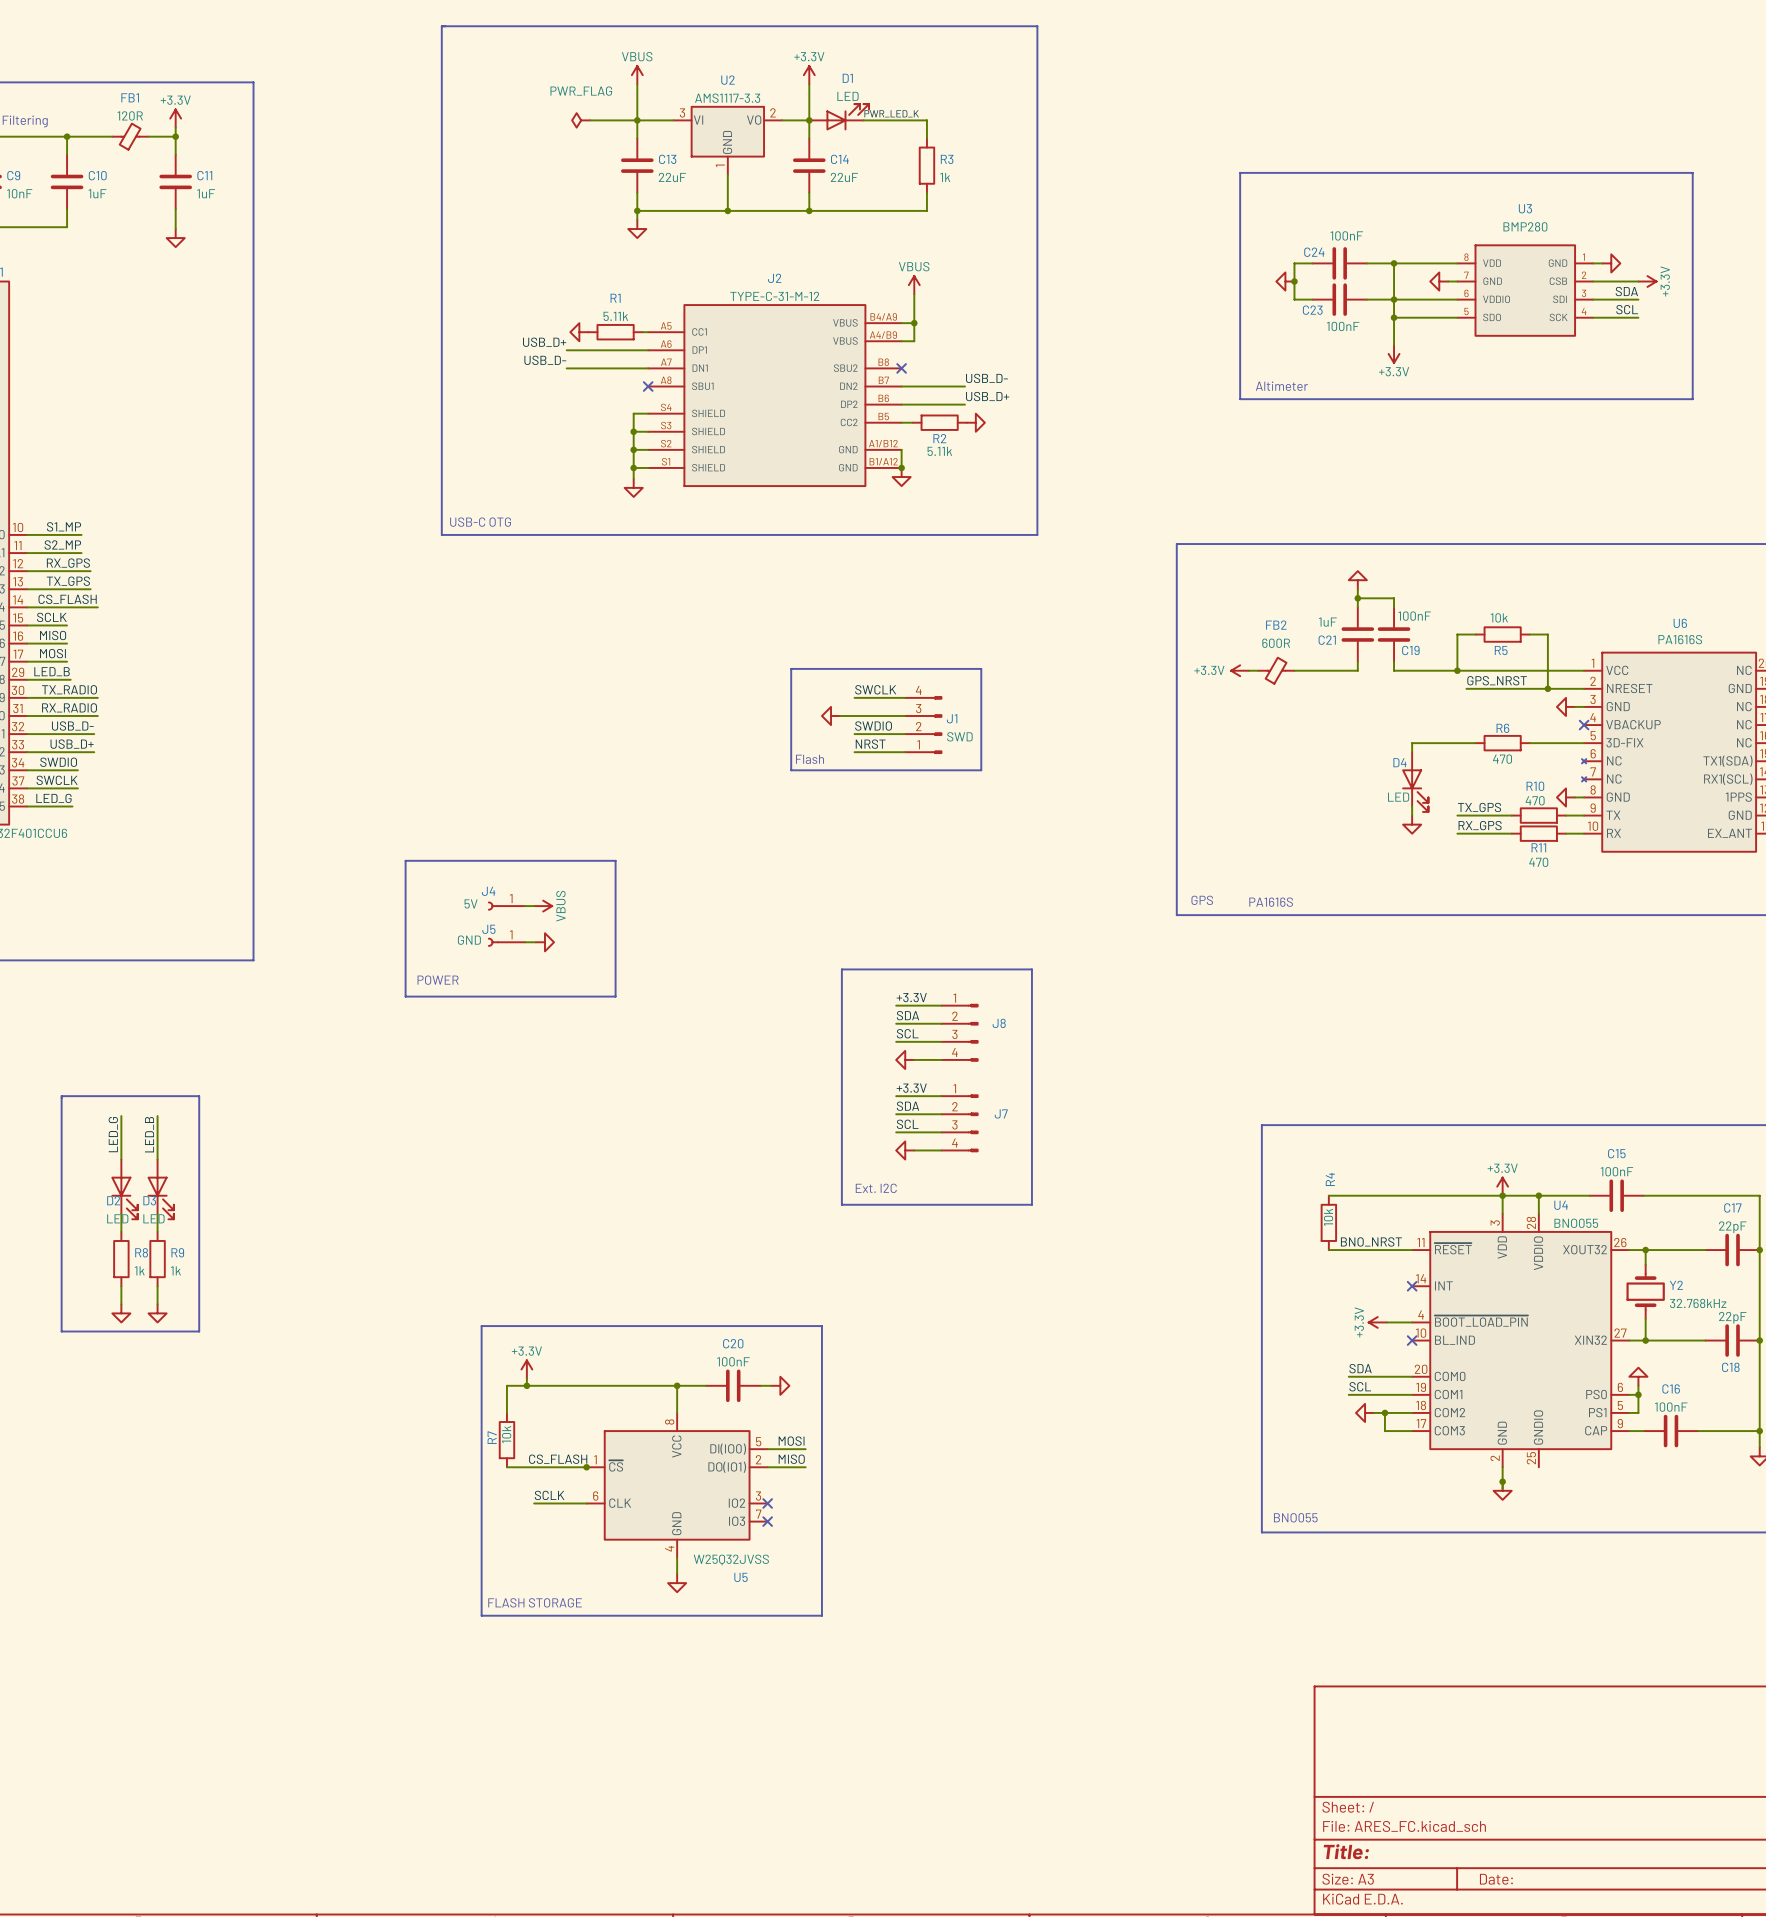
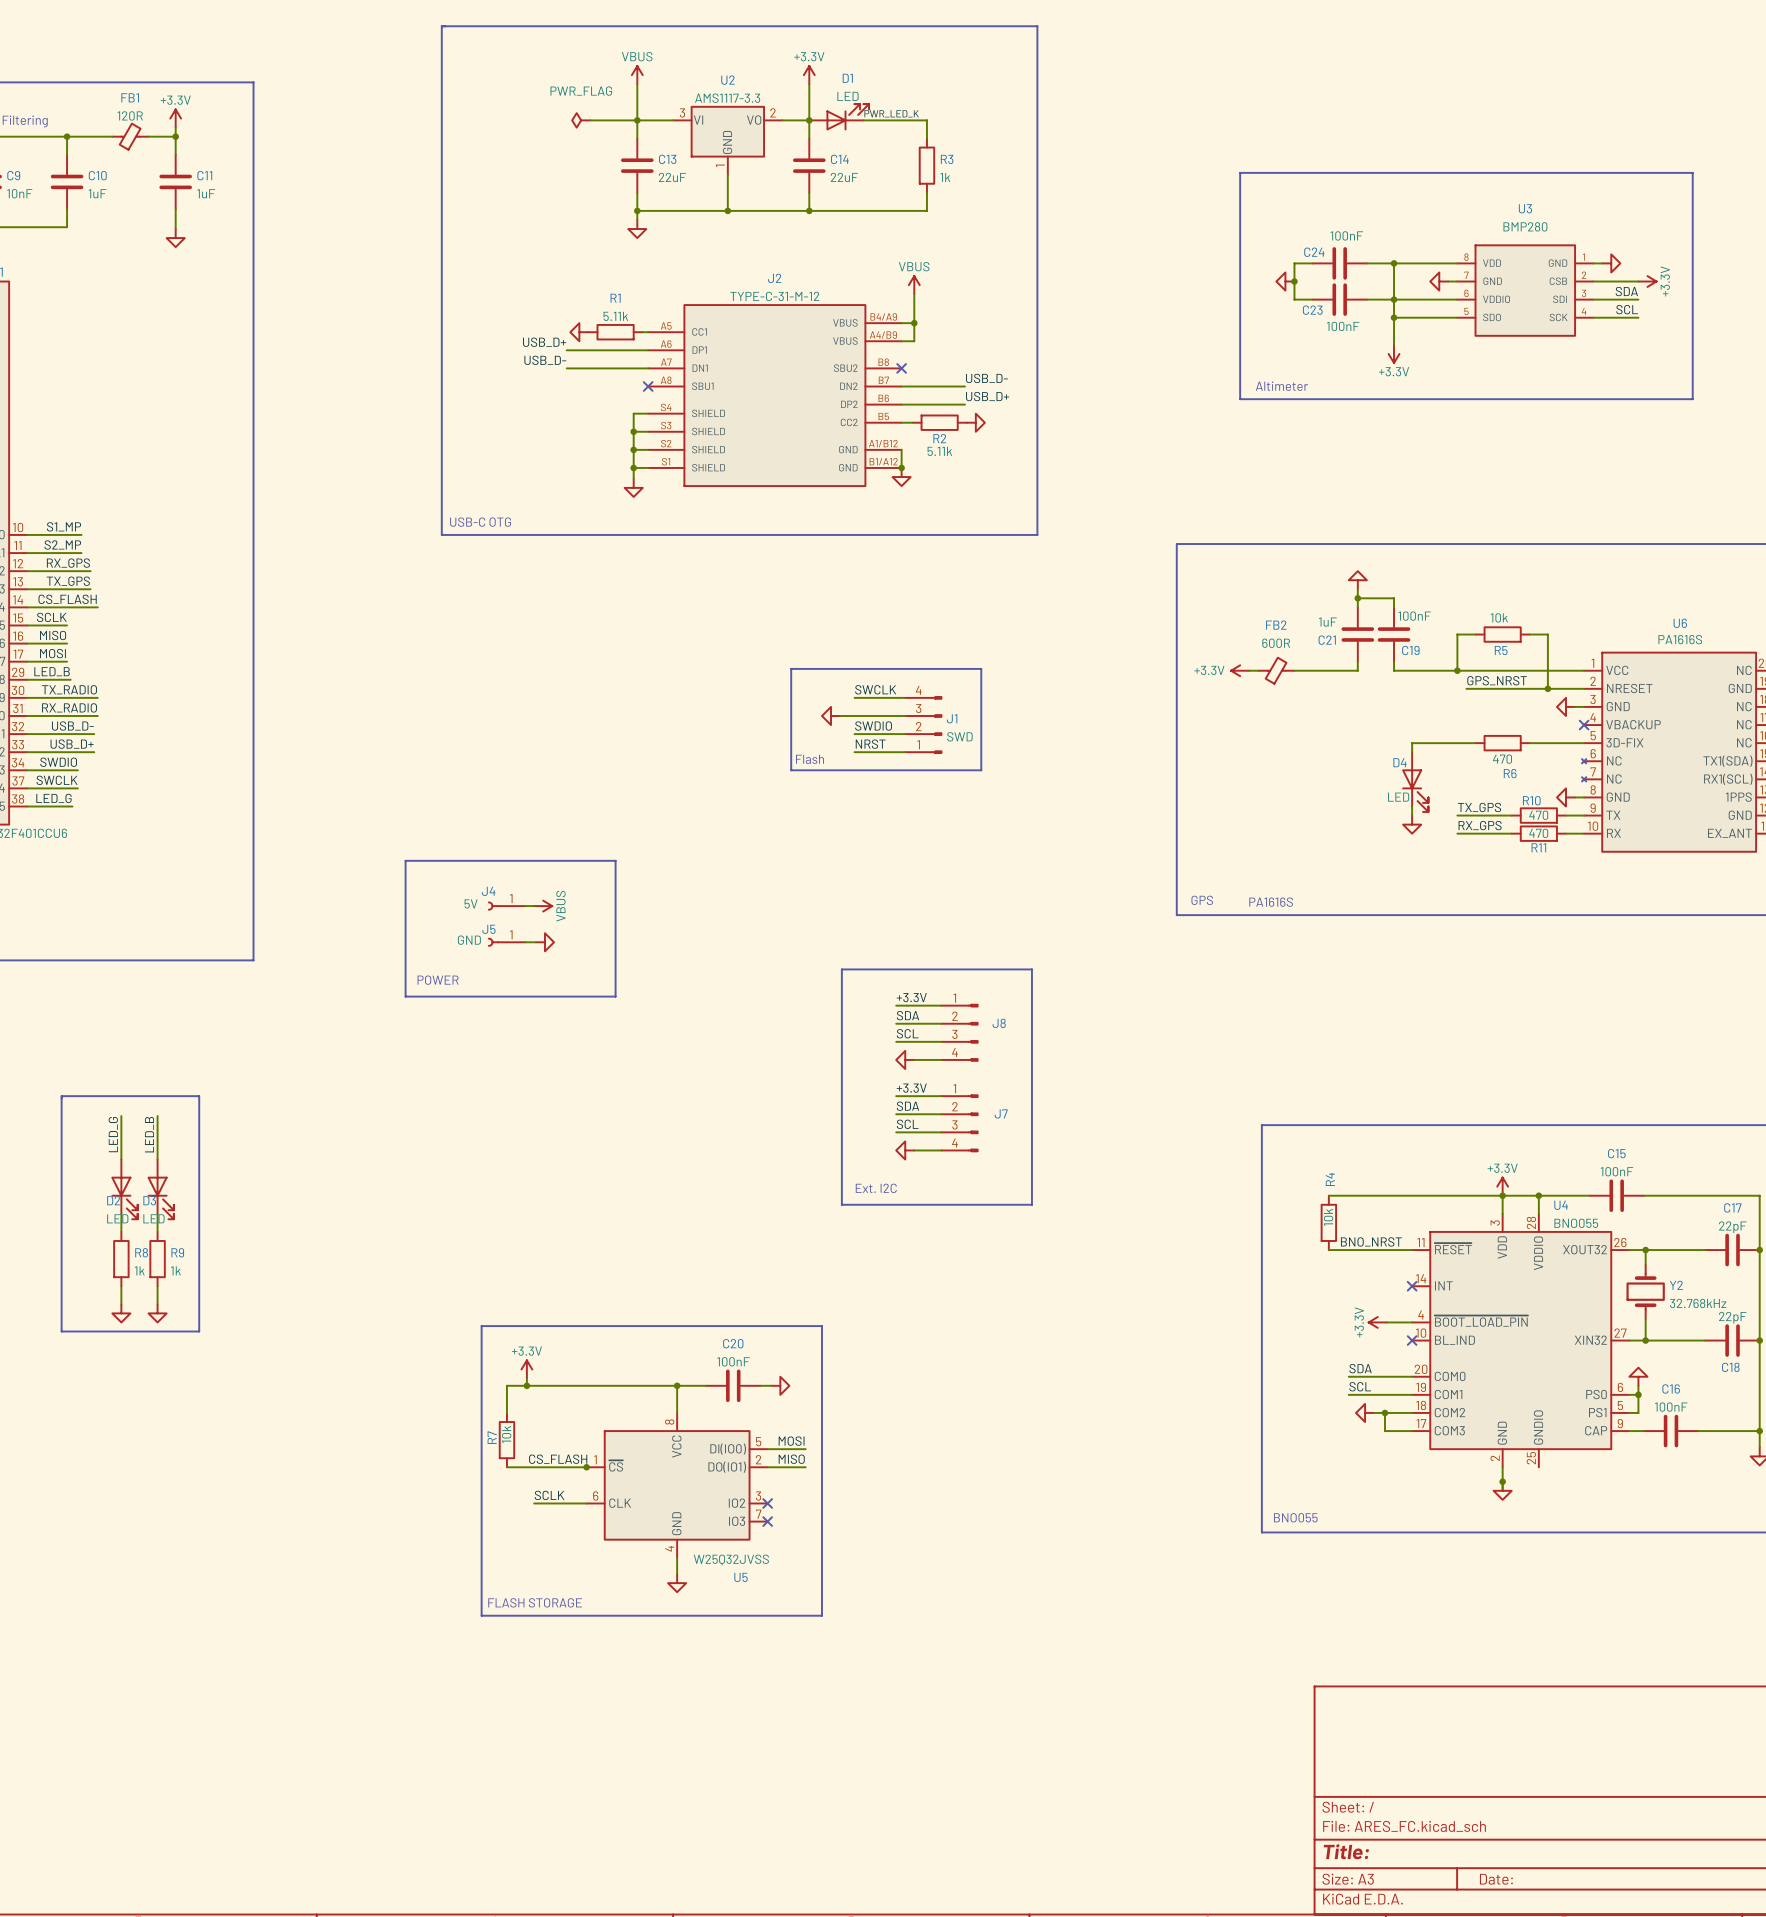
R6 name position: R6 (1502, 728) -> R6 (1510, 773)
R10 name position: R10 (1535, 786) -> R10 (1531, 800)
R10 value position: 470 (1535, 800) -> 470 (1538, 815)
R11 value position: 470 (1538, 862) -> 470 (1538, 833)

